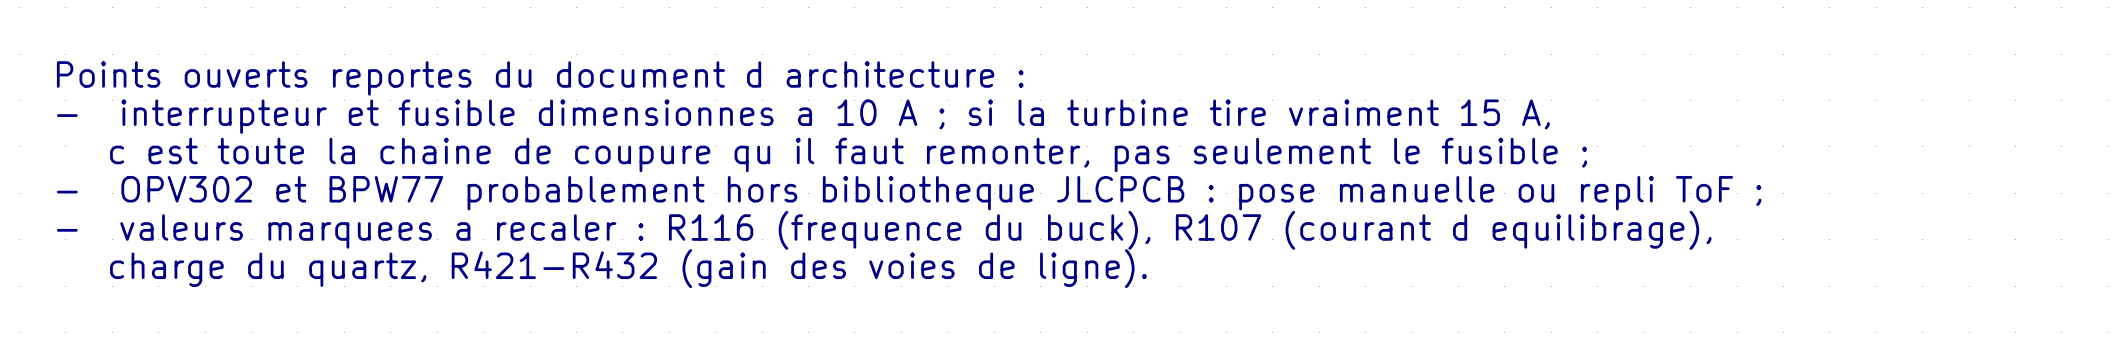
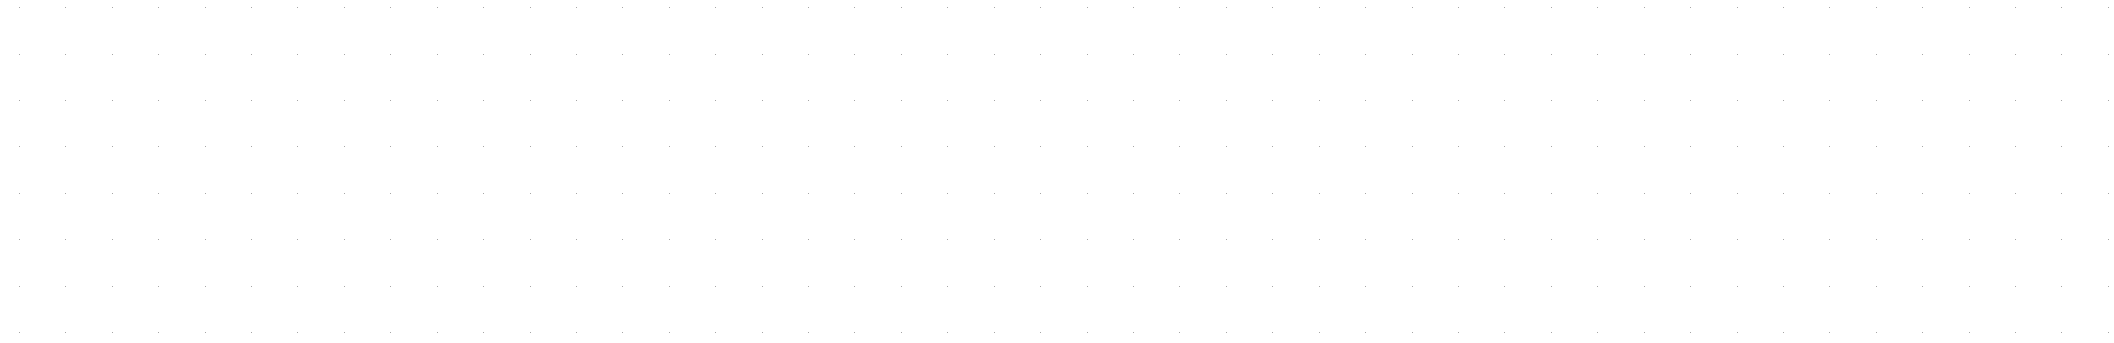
text: Points ouverts reportes du document d architecture : (540, 78) -> none
text: - interrupteur et fusible dimensionnes a 10 A ; si la turbine tire vraiment 15 A, (803, 116) -> none
text: c est toute la chaine de coupure qu il faut remonter, pas seulement le fusible ; (848, 154) -> none
text: - OPV302 et BPW77 probablement hors bibliotheque JLCPCB : pose manuelle ou repli ToF ; (909, 193) -> none
text: - valeurs marquees a recaler : R116 (frequence du buck), R107 (courant d equilibrage), (884, 230) -> none
text: charge du quartz, R421-R432 (gain des voies de ligne). (628, 268) -> none

